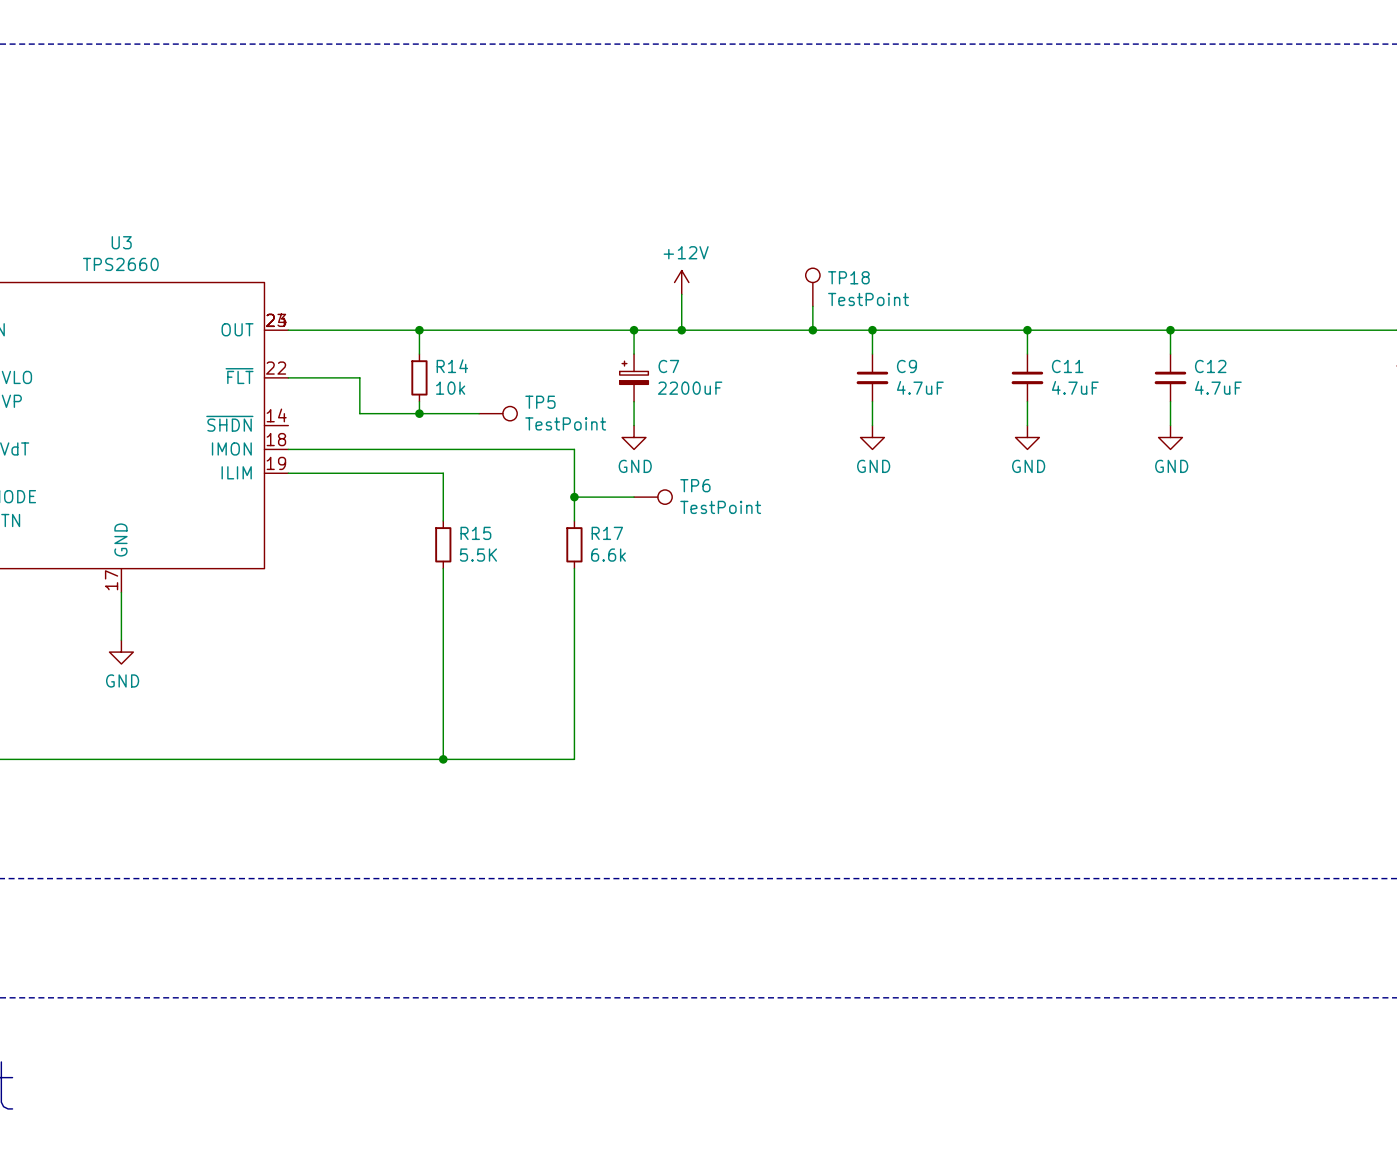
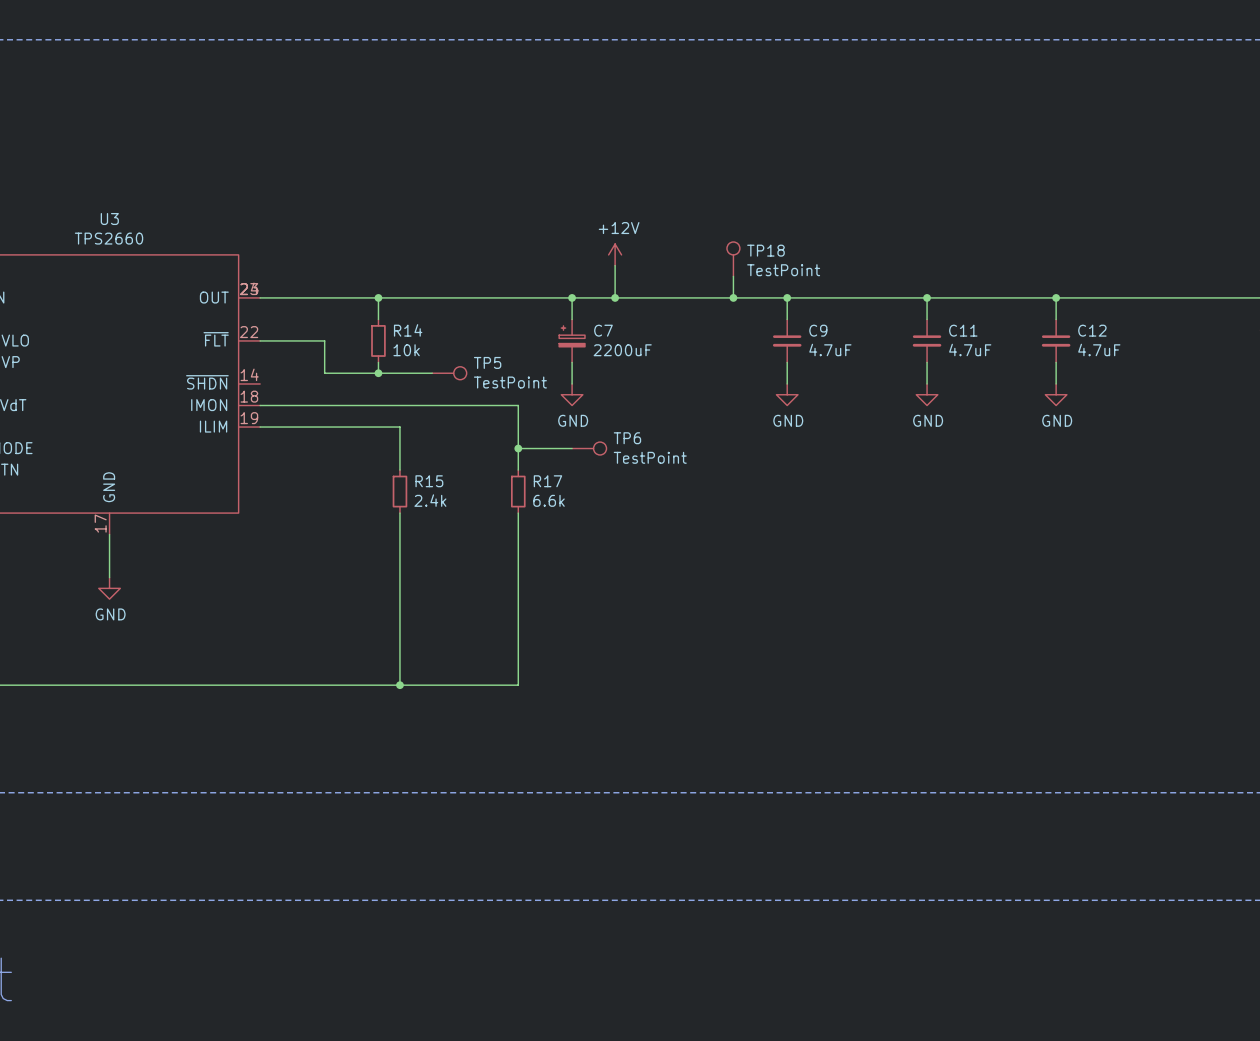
R15 value: 5.5K (478, 555) -> 2.4k (430, 500)

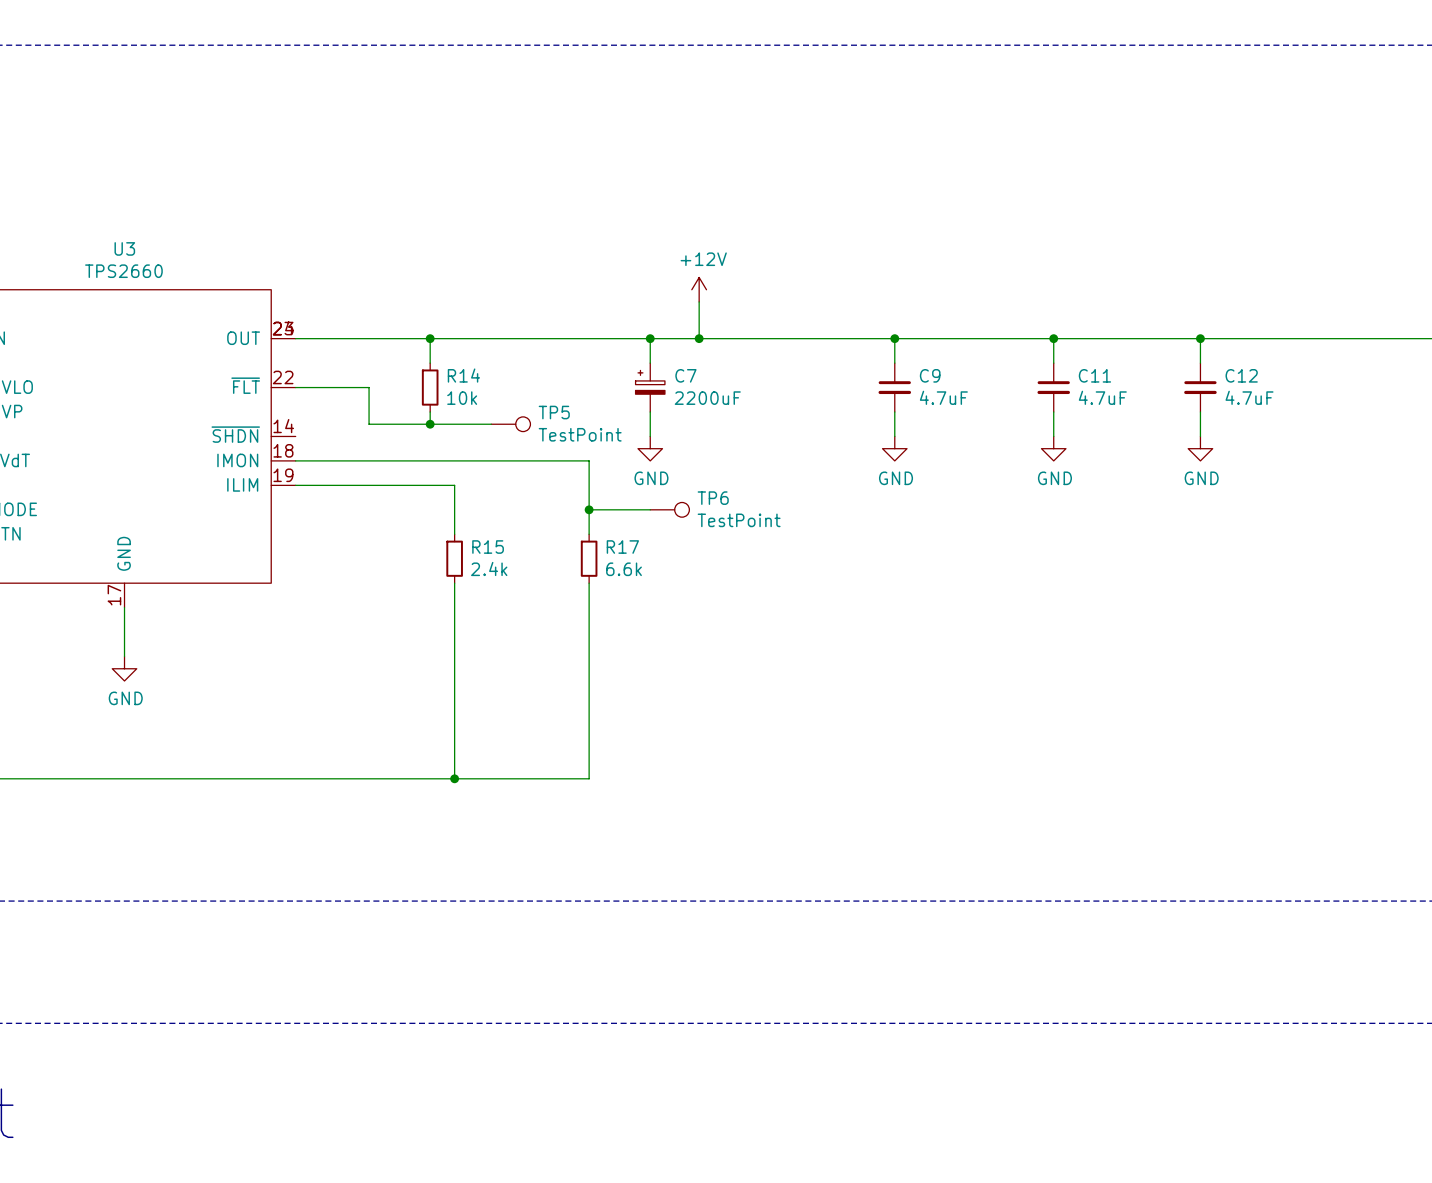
TP18: TestPoint (733, 259) -> none
wire: (733, 276) (733, 297) -> none
junction: (733, 297) -> none

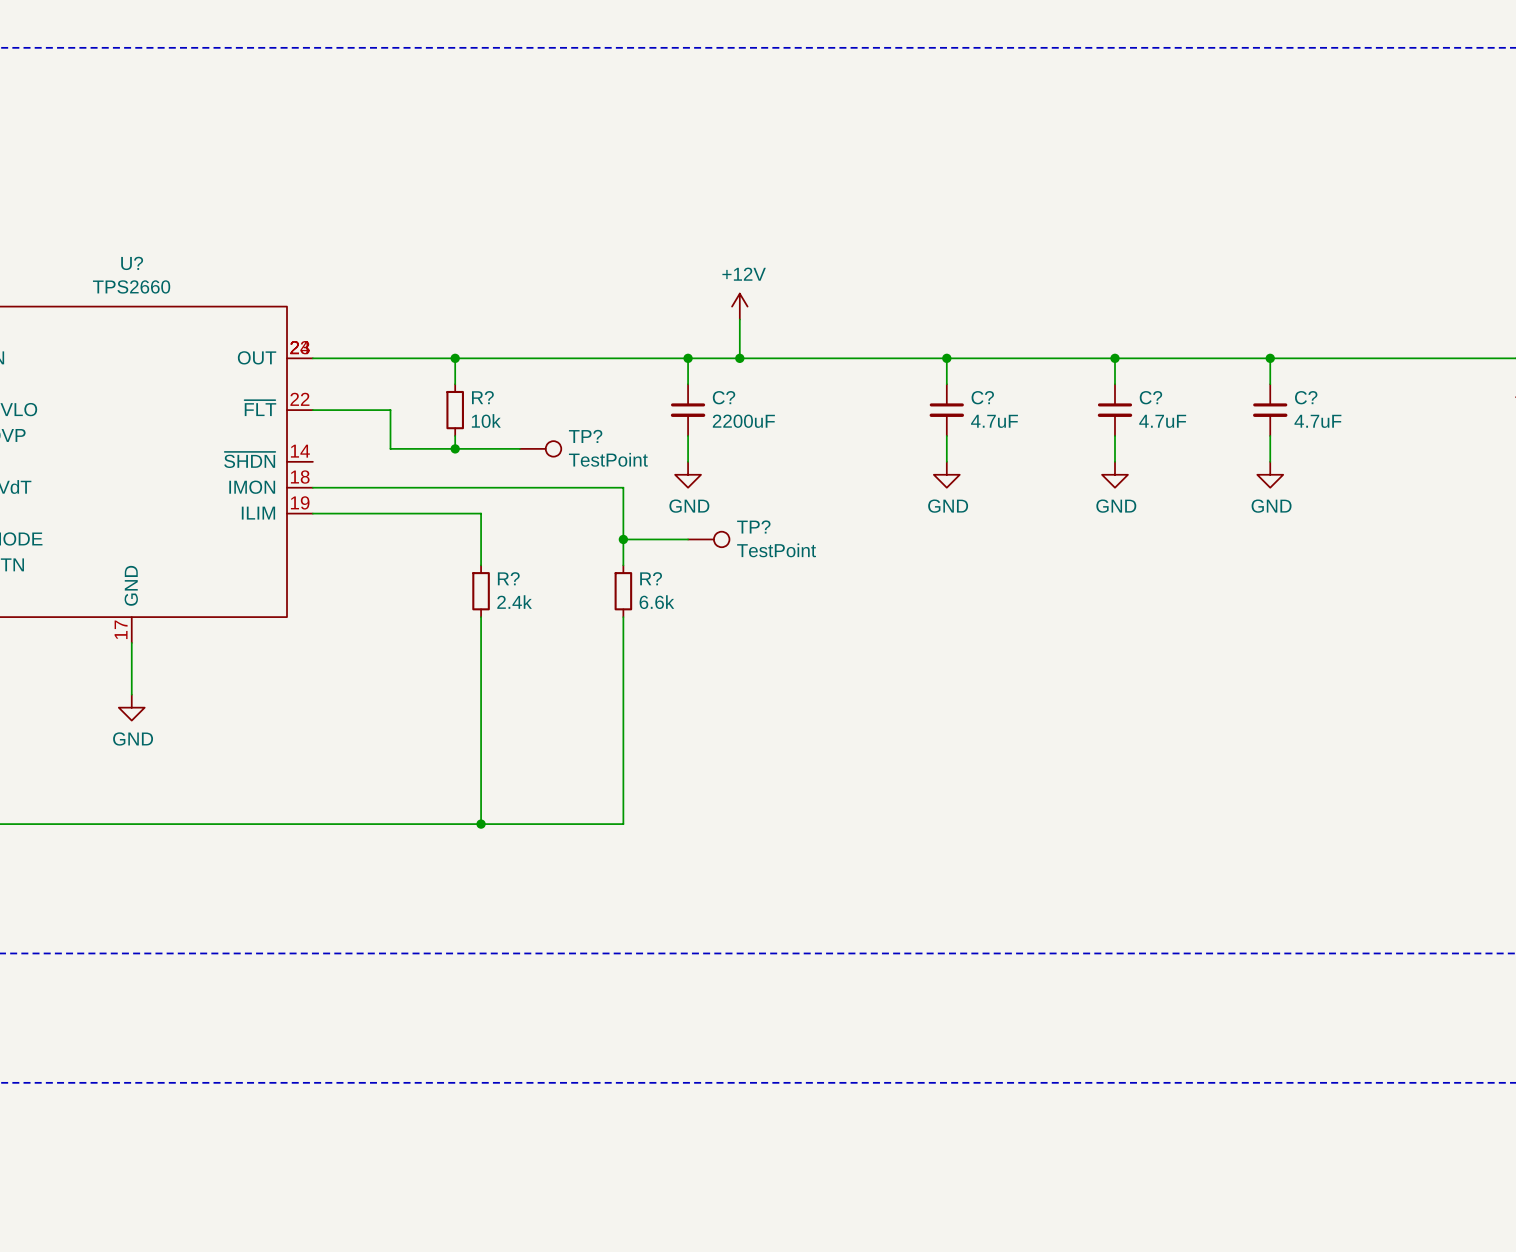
U3 name: U3 (124, 248) -> U? (132, 263)
R14 name: R14 (463, 375) -> R? (482, 397)
C9 name: C9 (930, 375) -> C? (982, 397)
C11 name: C11 (1094, 375) -> C? (1150, 397)
C12 name: C12 (1241, 375) -> C? (1306, 397)
C7: 2200uF (650, 387) -> none
C?: none -> 2200uF (688, 410)
TP5 name: TP5 (554, 412) -> TP? (585, 436)
TP6 name: TP6 (713, 498) -> TP? (753, 526)
R15 name: R15 (488, 547) -> R? (508, 578)
R17 name: R17 (622, 547) -> R? (651, 578)

